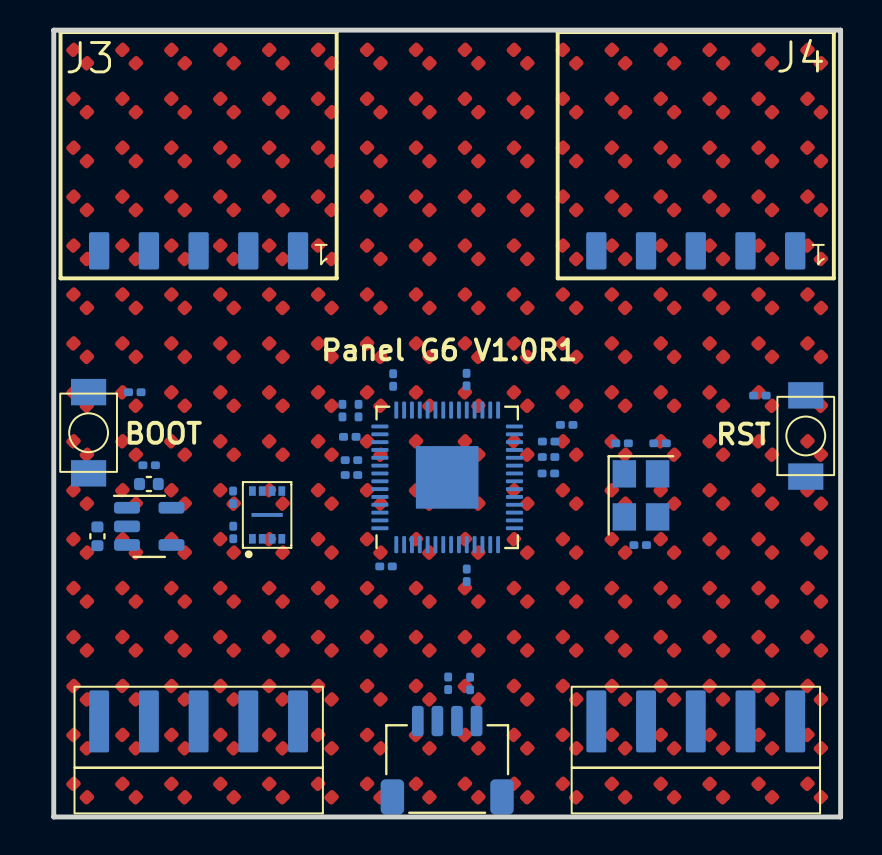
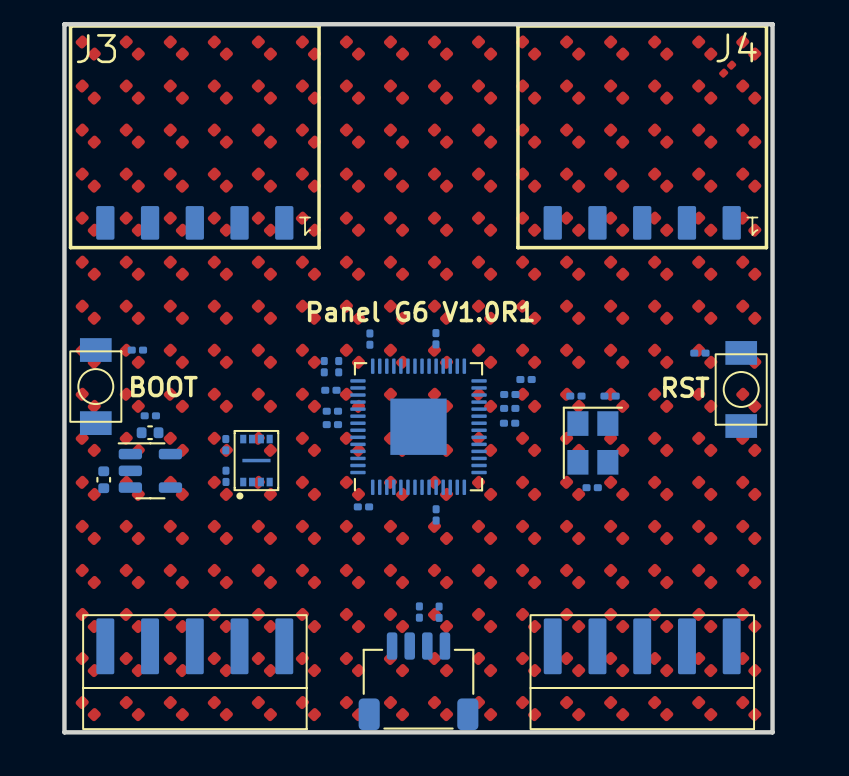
part: none -> (727, 69)

